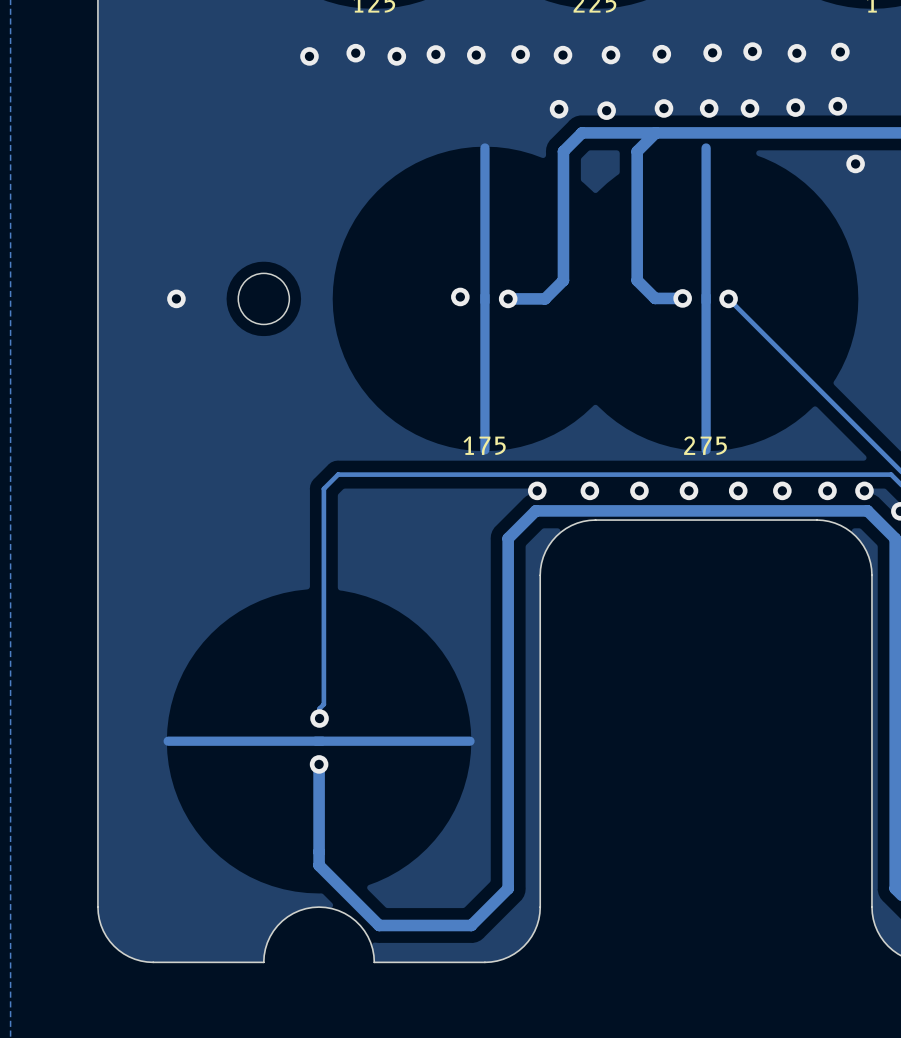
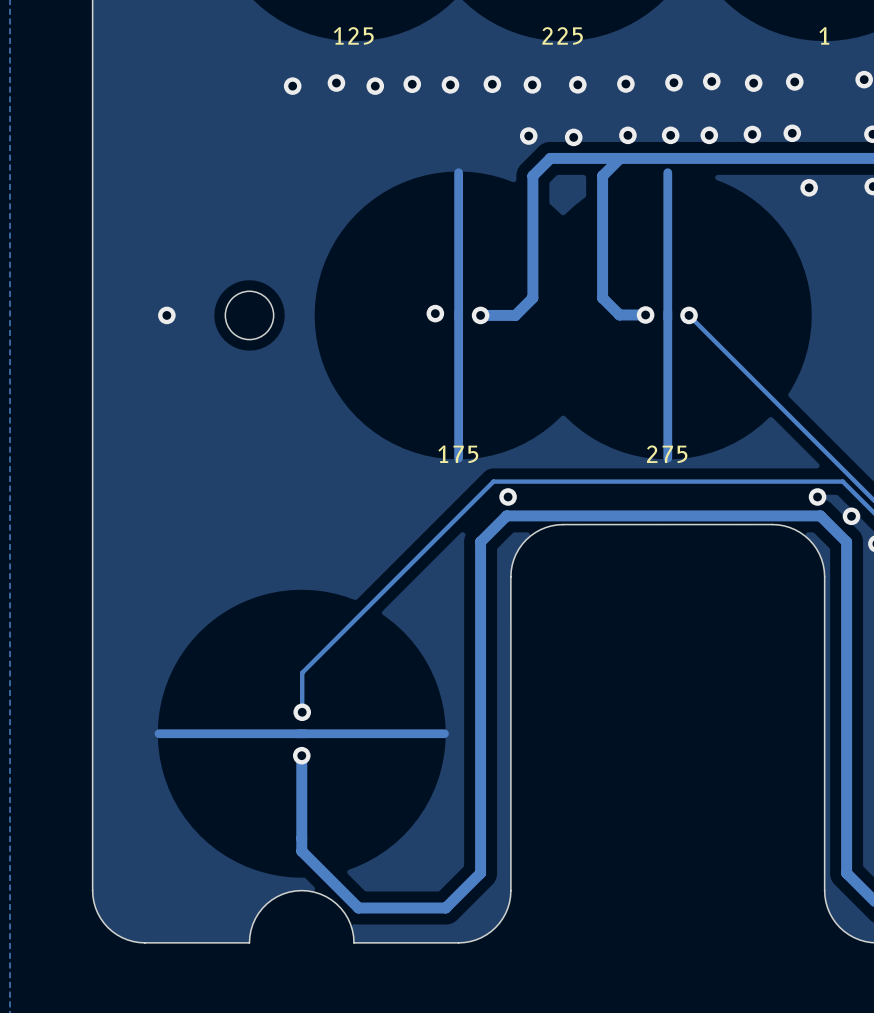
track: (521, 474) (338, 474) (323, 488) (323, 704) (319, 708) -> (493, 481) (302, 672) (302, 702)
via: (589, 490) -> none
via: (639, 490) -> none
via: (689, 490) -> none
via: (738, 490) -> none
via: (782, 490) -> none
via: (827, 490) -> none

